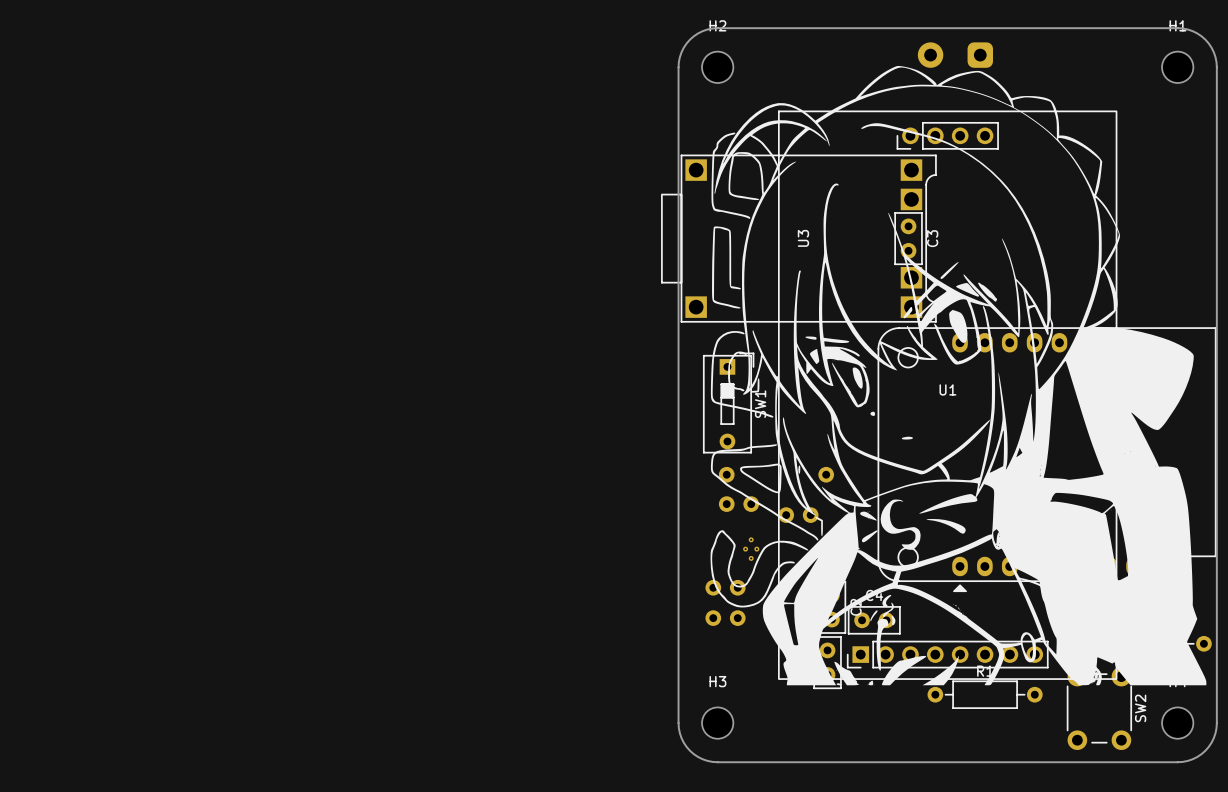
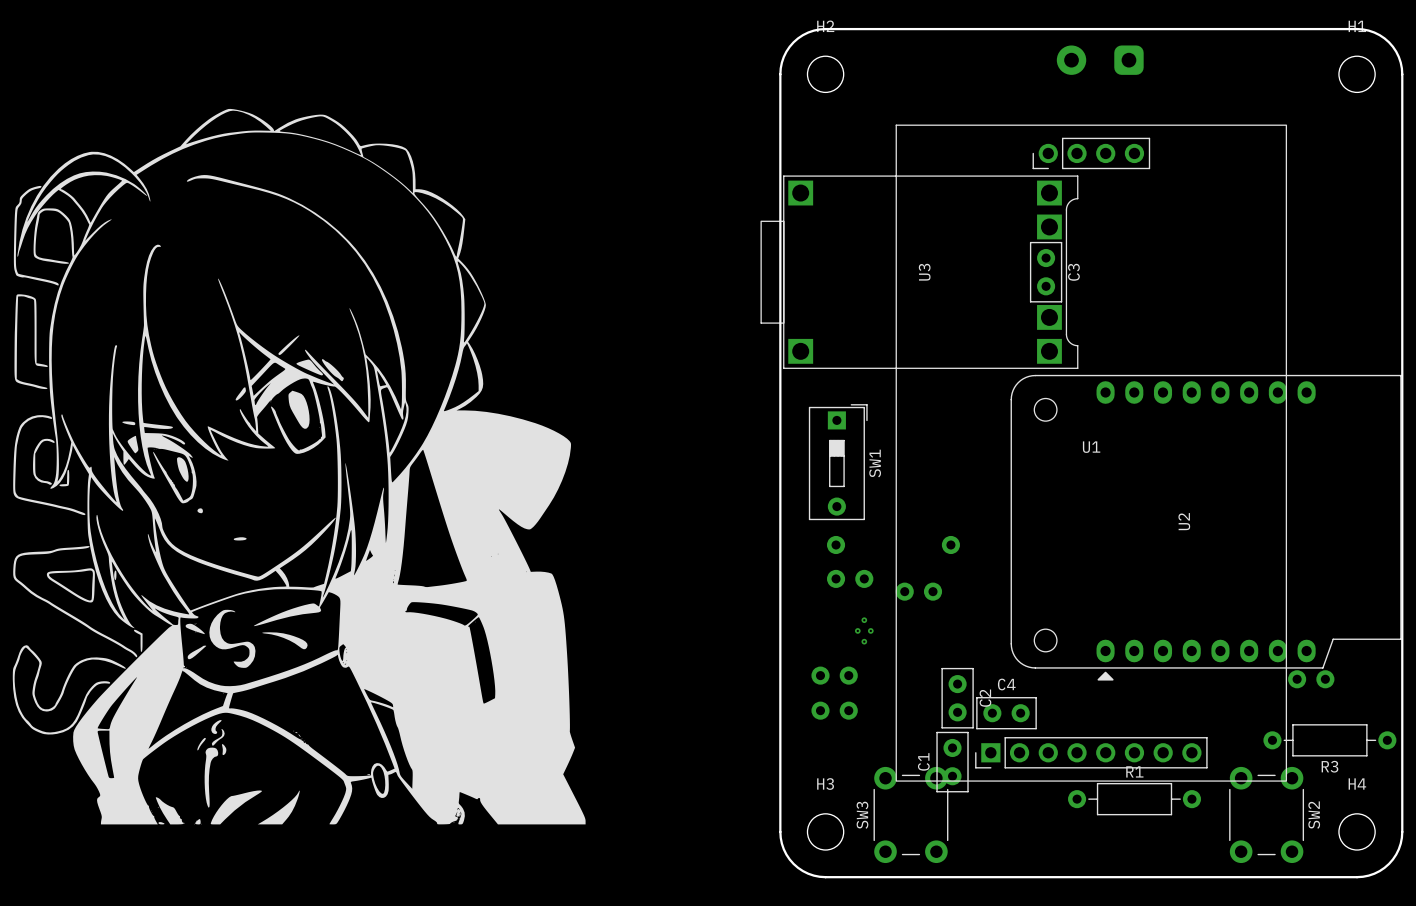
drawing: [710, 65, 1207, 686] -> none
drawing: none -> [12, 108, 586, 825]
SW3: none -> (910, 814)

